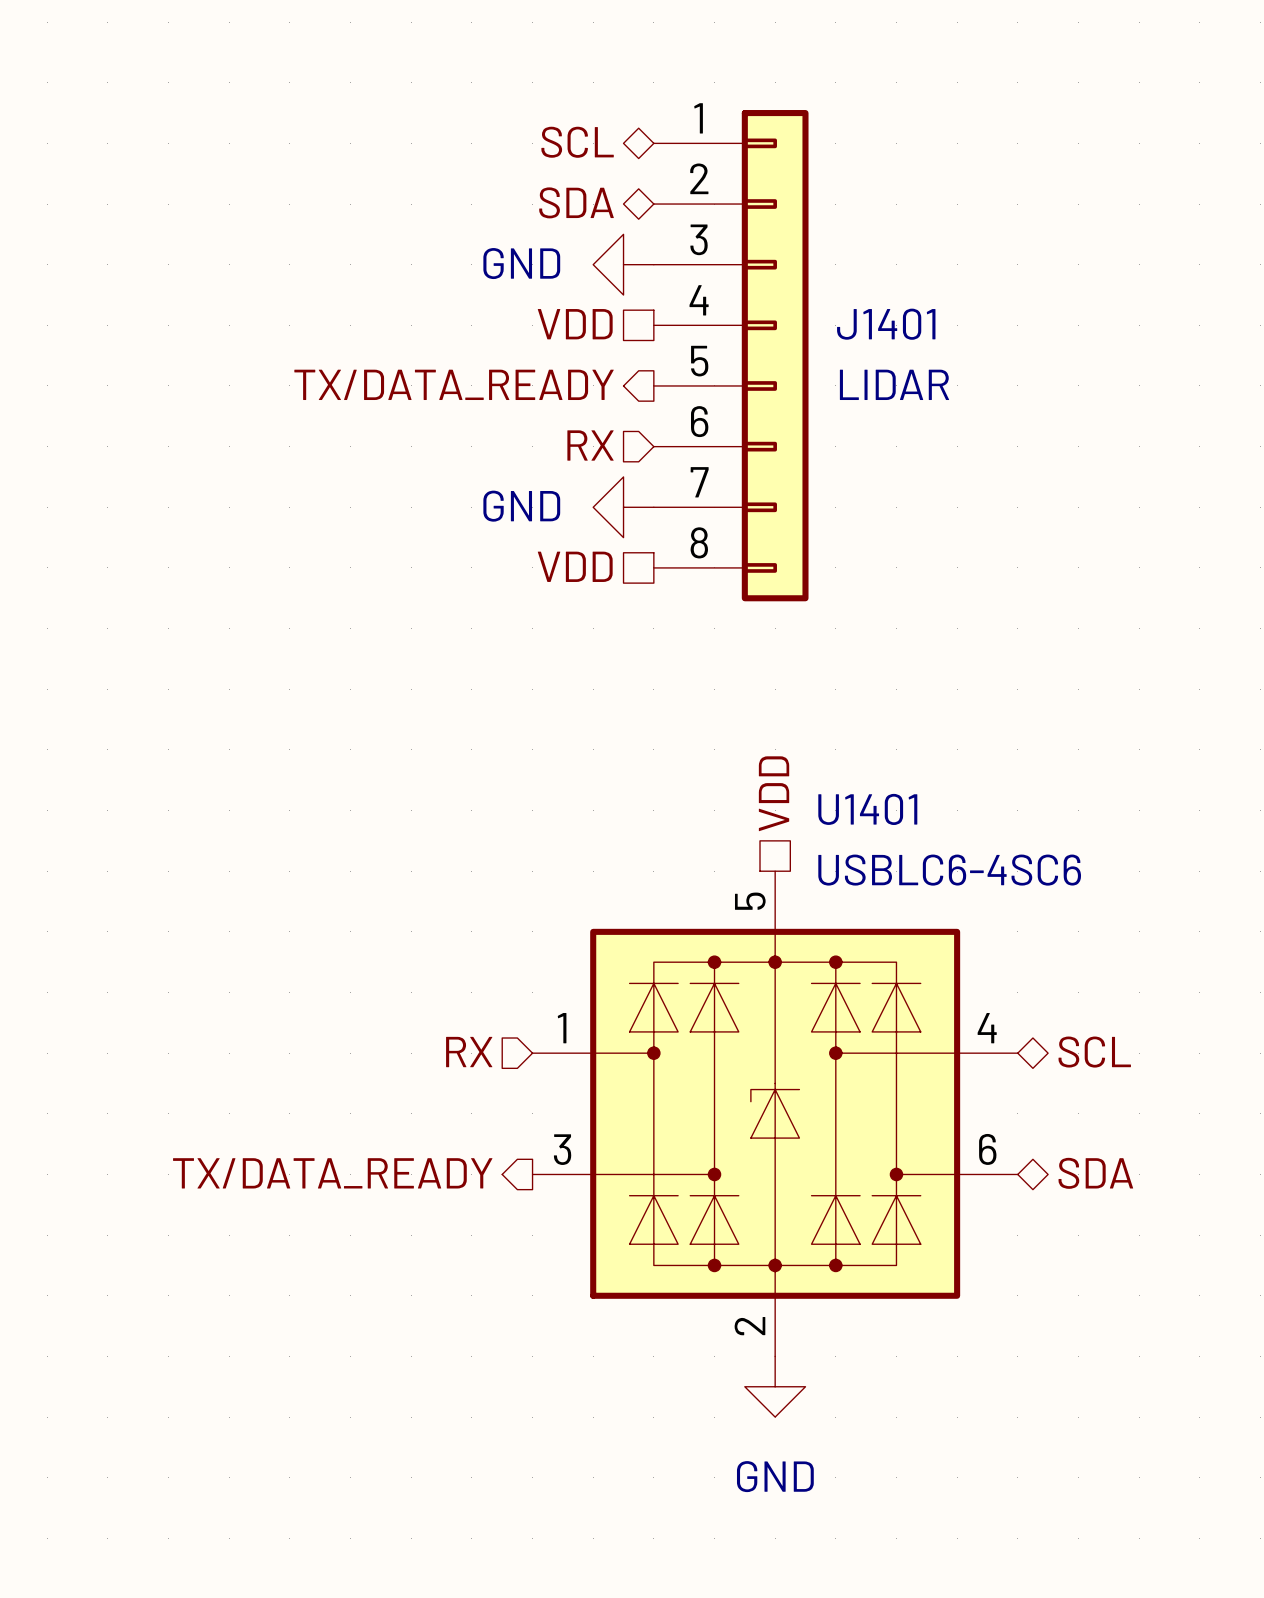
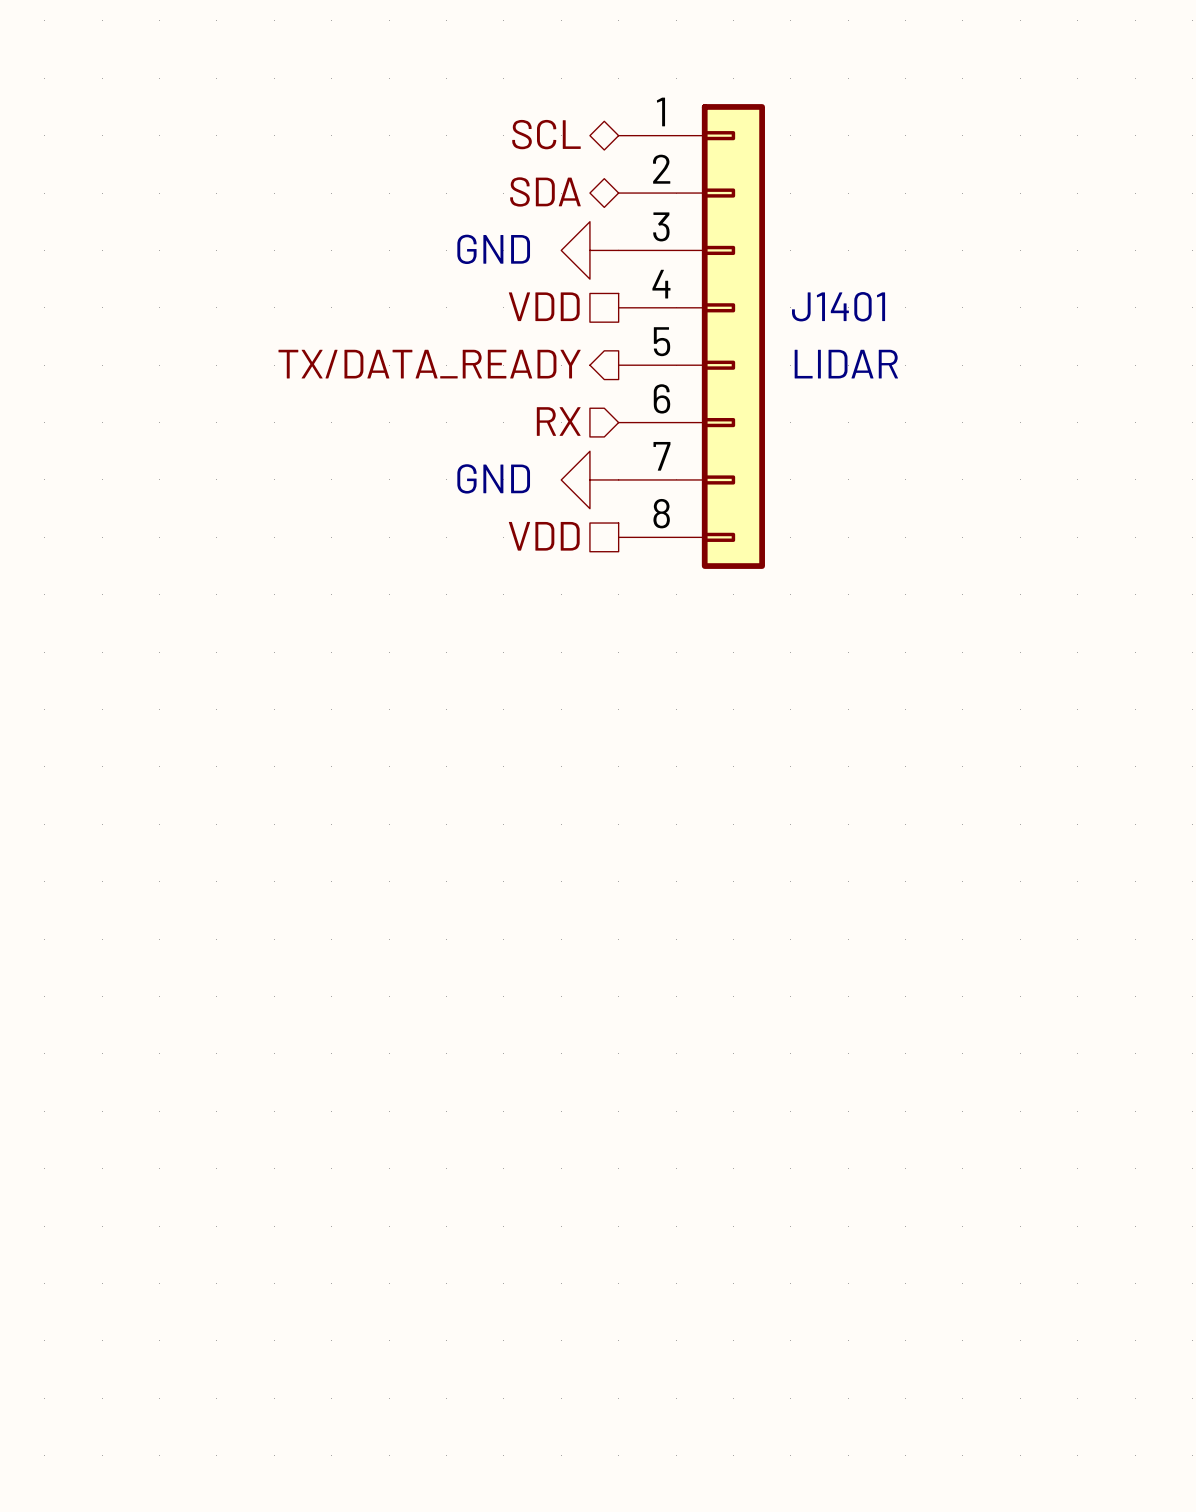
hierarchical label: VDD (774, 793) -> none
hierarchical label: RX (469, 1052) -> none
hierarchical label: SCL (1094, 1052) -> none
U1401: USBLC6-4SC6 (775, 1113) -> none
hierarchical label: TX/DATA_READY (332, 1173) -> none
hierarchical label: SDA (1095, 1173) -> none
power symbol: GND (775, 1386) -> none

